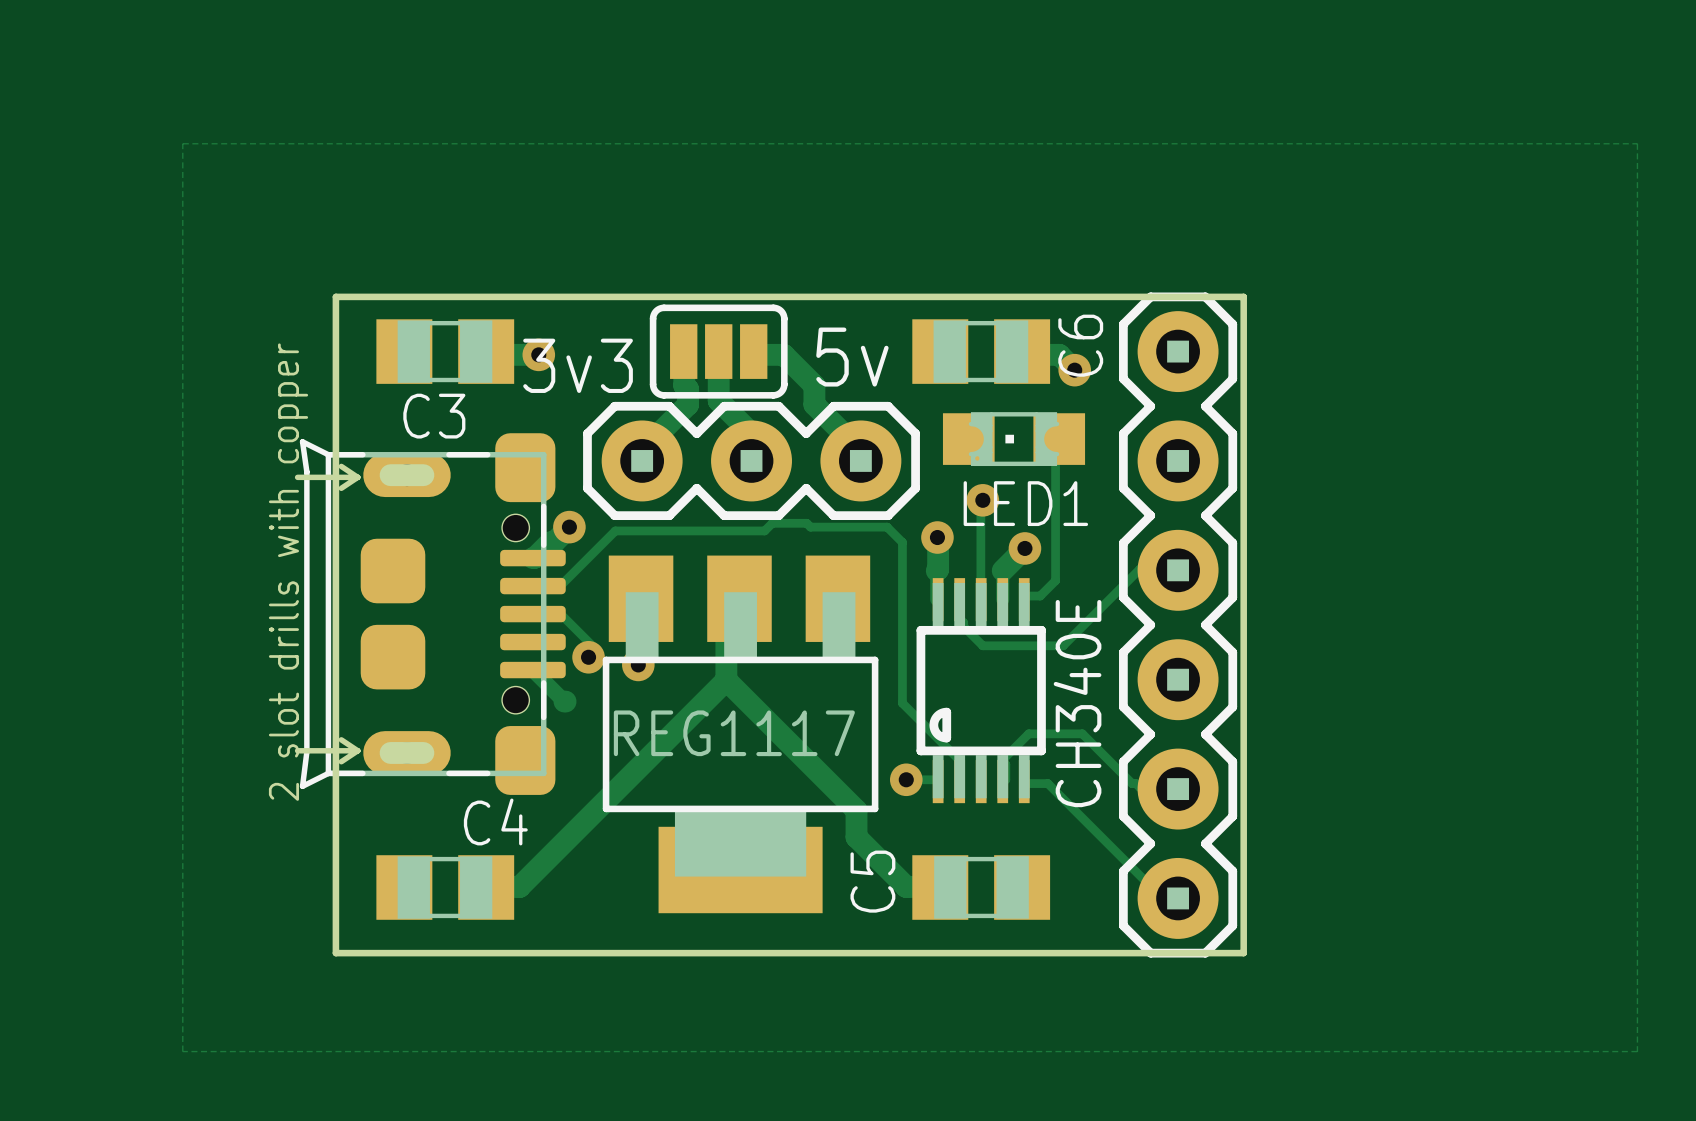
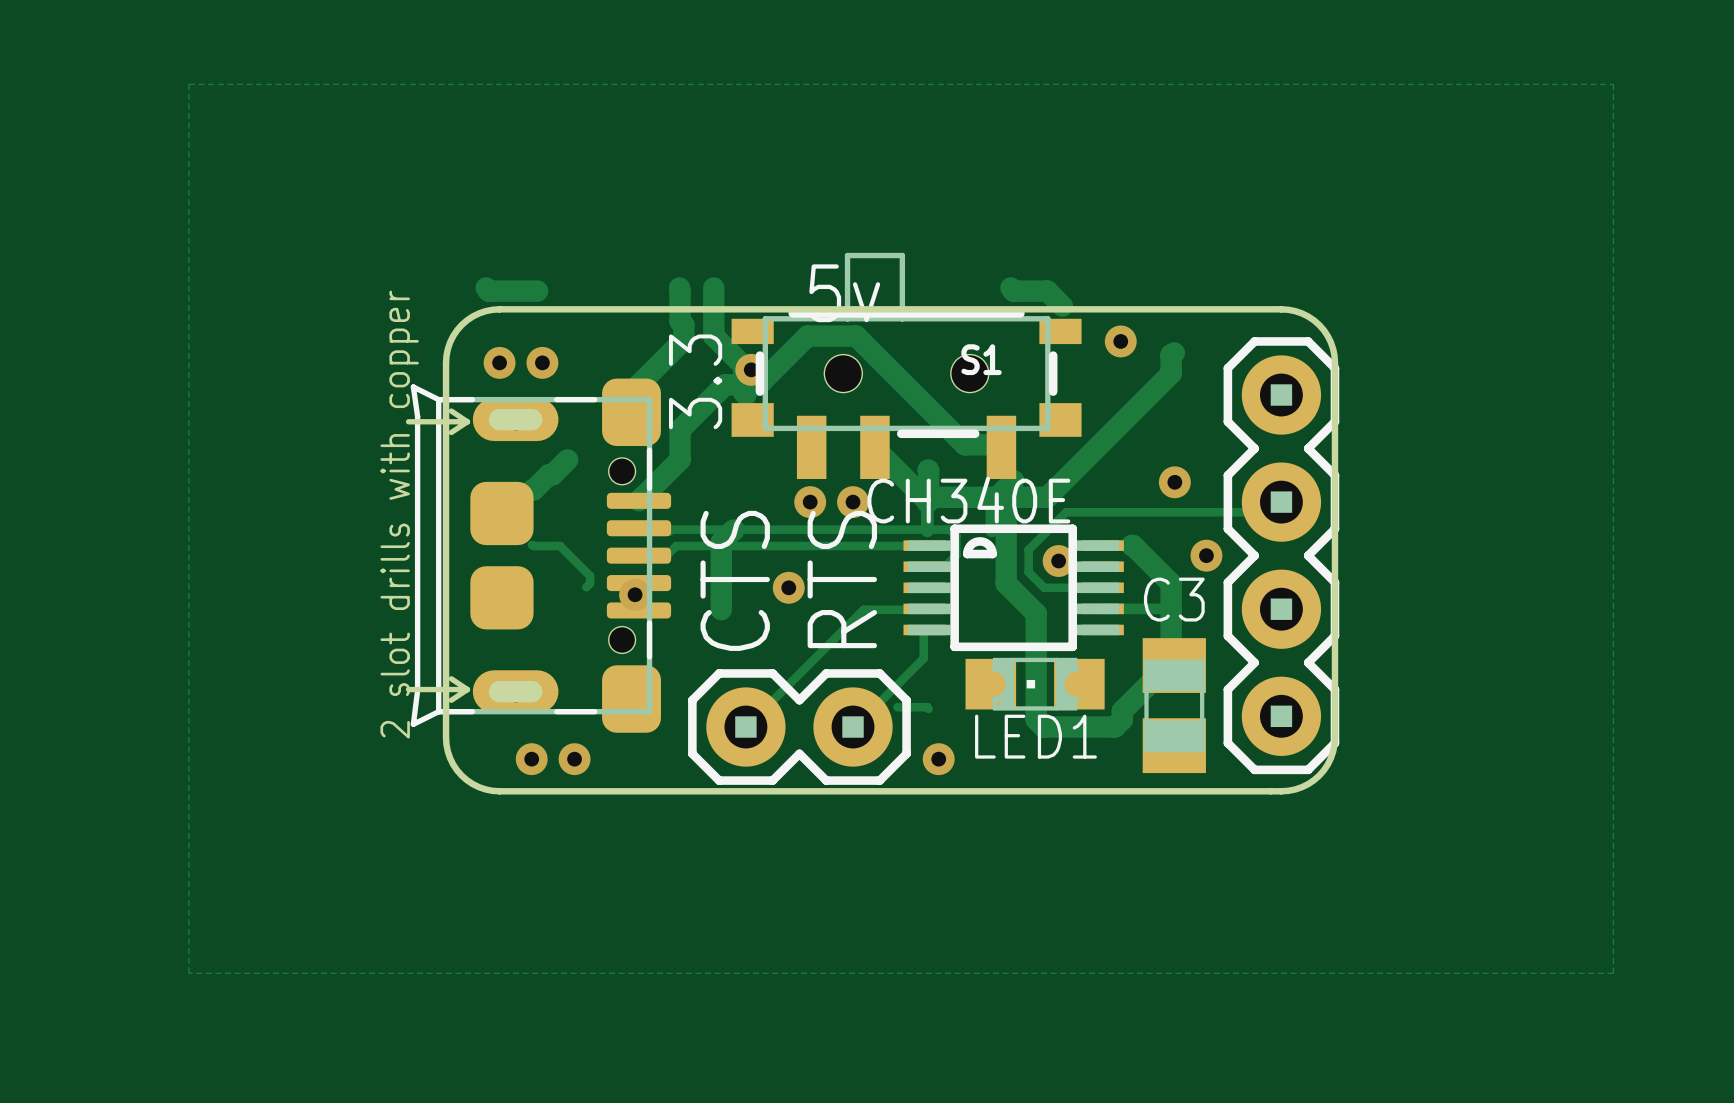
board edge: (335, 296) (1243, 296) (1243, 953) (335, 953) (335, 296) -> (499, 309) (479, 313) (461, 325) (450, 342) (446, 362) (446, 737) (447, 751) (453, 764) (461, 775) (472, 784) (485, 789) (499, 791) (1281, 791) (1295, 789) (1308, 784) (1319, 775) (1327, 764) (1333, 751) (1334, 737) (1334, 362) (1333, 349) (1327, 336) (1319, 325) (1308, 316) (1295, 311) (1281, 309) (499, 309)
C3 rotation: 0° (445, 351) -> 90° clockwise (1174, 705)
C3 position: (445, 351) -> (1174, 705)
part: (718, 351) -> none
track: (753, 351) (756, 354) (783, 354) (814, 385) (814, 404) (860, 450) (860, 460) -> none
C6: (981, 351) -> none
via: (538, 354) -> none
text: 3v3 (578, 365) -> none
via position: (1074, 370) -> (1120, 341)
C3 name position: C3 (434, 416) -> C3 (1174, 599)
track: none -> (1174, 352) (1171, 354) (1171, 373) (1047, 497) (923, 497) (874, 447)
via: none -> (499, 362)
via: none -> (542, 362)
S1: none -> (906, 365)
via: none -> (751, 369)
LED1 position: (1014, 439) -> (1035, 684)
track: (1059, 439) (1055, 439) (1055, 580) (1040, 596) (1024, 596) (1024, 599) -> none
text: none -> 3.3 (695, 381)
part: (751, 460) -> none
track: (982, 500) (980, 502) (980, 590) -> none
via: (982, 500) -> none
LED1 name position: LED1 (1025, 503) -> LED1 (1035, 736)
track: none -> (1001, 447) (998, 444) (964, 444) (856, 336) (807, 336) (758, 384) (725, 384) (680, 429) (680, 459) (638, 500)
via: (569, 527) -> none
via: (937, 537) -> none
via: (1024, 548) -> none
via: none -> (1174, 482)
track: none -> (1006, 497) (1006, 583) (1036, 613) (1036, 719) (1043, 727) (1114, 727) (1122, 719) (1122, 710) (1163, 669) (1174, 665) (1171, 662) (1171, 583) (1132, 545)
via: none -> (810, 502)
via: none -> (853, 502)
track: (1178, 570) (1139, 569) (1063, 645) (982, 645) (963, 626) (963, 622) (959, 618) (959, 599) -> none
track: none -> (1281, 502) (1272, 512) (1066, 512) (1028, 549) (1028, 572) (1044, 587) (1102, 587)
track: (532, 586) (561, 584) (615, 530) (764, 530) (772, 523) (806, 523) (810, 527) (887, 527) (902, 542) (902, 703) (959, 760) (959, 781) -> none
track: none -> (638, 528) (642, 531) (669, 531) (671, 529) (950, 529) (956, 535) (956, 555) (949, 562) (949, 566)
part position: (430, 614) -> (538, 555)
track: none -> (924, 545) (676, 546) (668, 553) (642, 553) (638, 555)
part: (1178, 625) -> none
via: none -> (1206, 555)
part: none -> (1281, 555)
via: none -> (1058, 561)
text: none -> RTS (842, 579)
text: none -> CTS (735, 580)
via: (588, 657) -> none
via: none -> (788, 587)
track: (532, 670) (565, 701) -> none
track: none -> (924, 608) (863, 609) (745, 727)
track: none -> (1102, 608) (1170, 608)
CH340E rotation: 0° (981, 690) -> 90° clockwise (1013, 587)
track: none -> (924, 629) (923, 658) (853, 727)
CH340E name position: CH340E (1077, 703) -> CH340E (968, 500)
part: REG1117 (740, 734) -> none
via position: (906, 779) -> (938, 759)
track: (1002, 781) (1005, 779) (1005, 764) (1001, 760) (1028, 733) (1082, 733) (1132, 783) (1135, 783) (1139, 787) (1178, 787) (1178, 789) -> none
track: (1024, 781) (1024, 783) (1047, 783) (1162, 898) (1178, 898) -> none
part: none -> (799, 727)
via: none -> (531, 759)
via: none -> (574, 759)
C4: (445, 887) -> none
track: (486, 887) (519, 886) (726, 680) (856, 810) (856, 837) (906, 886) (940, 887) -> none
C5: (981, 887) -> none

